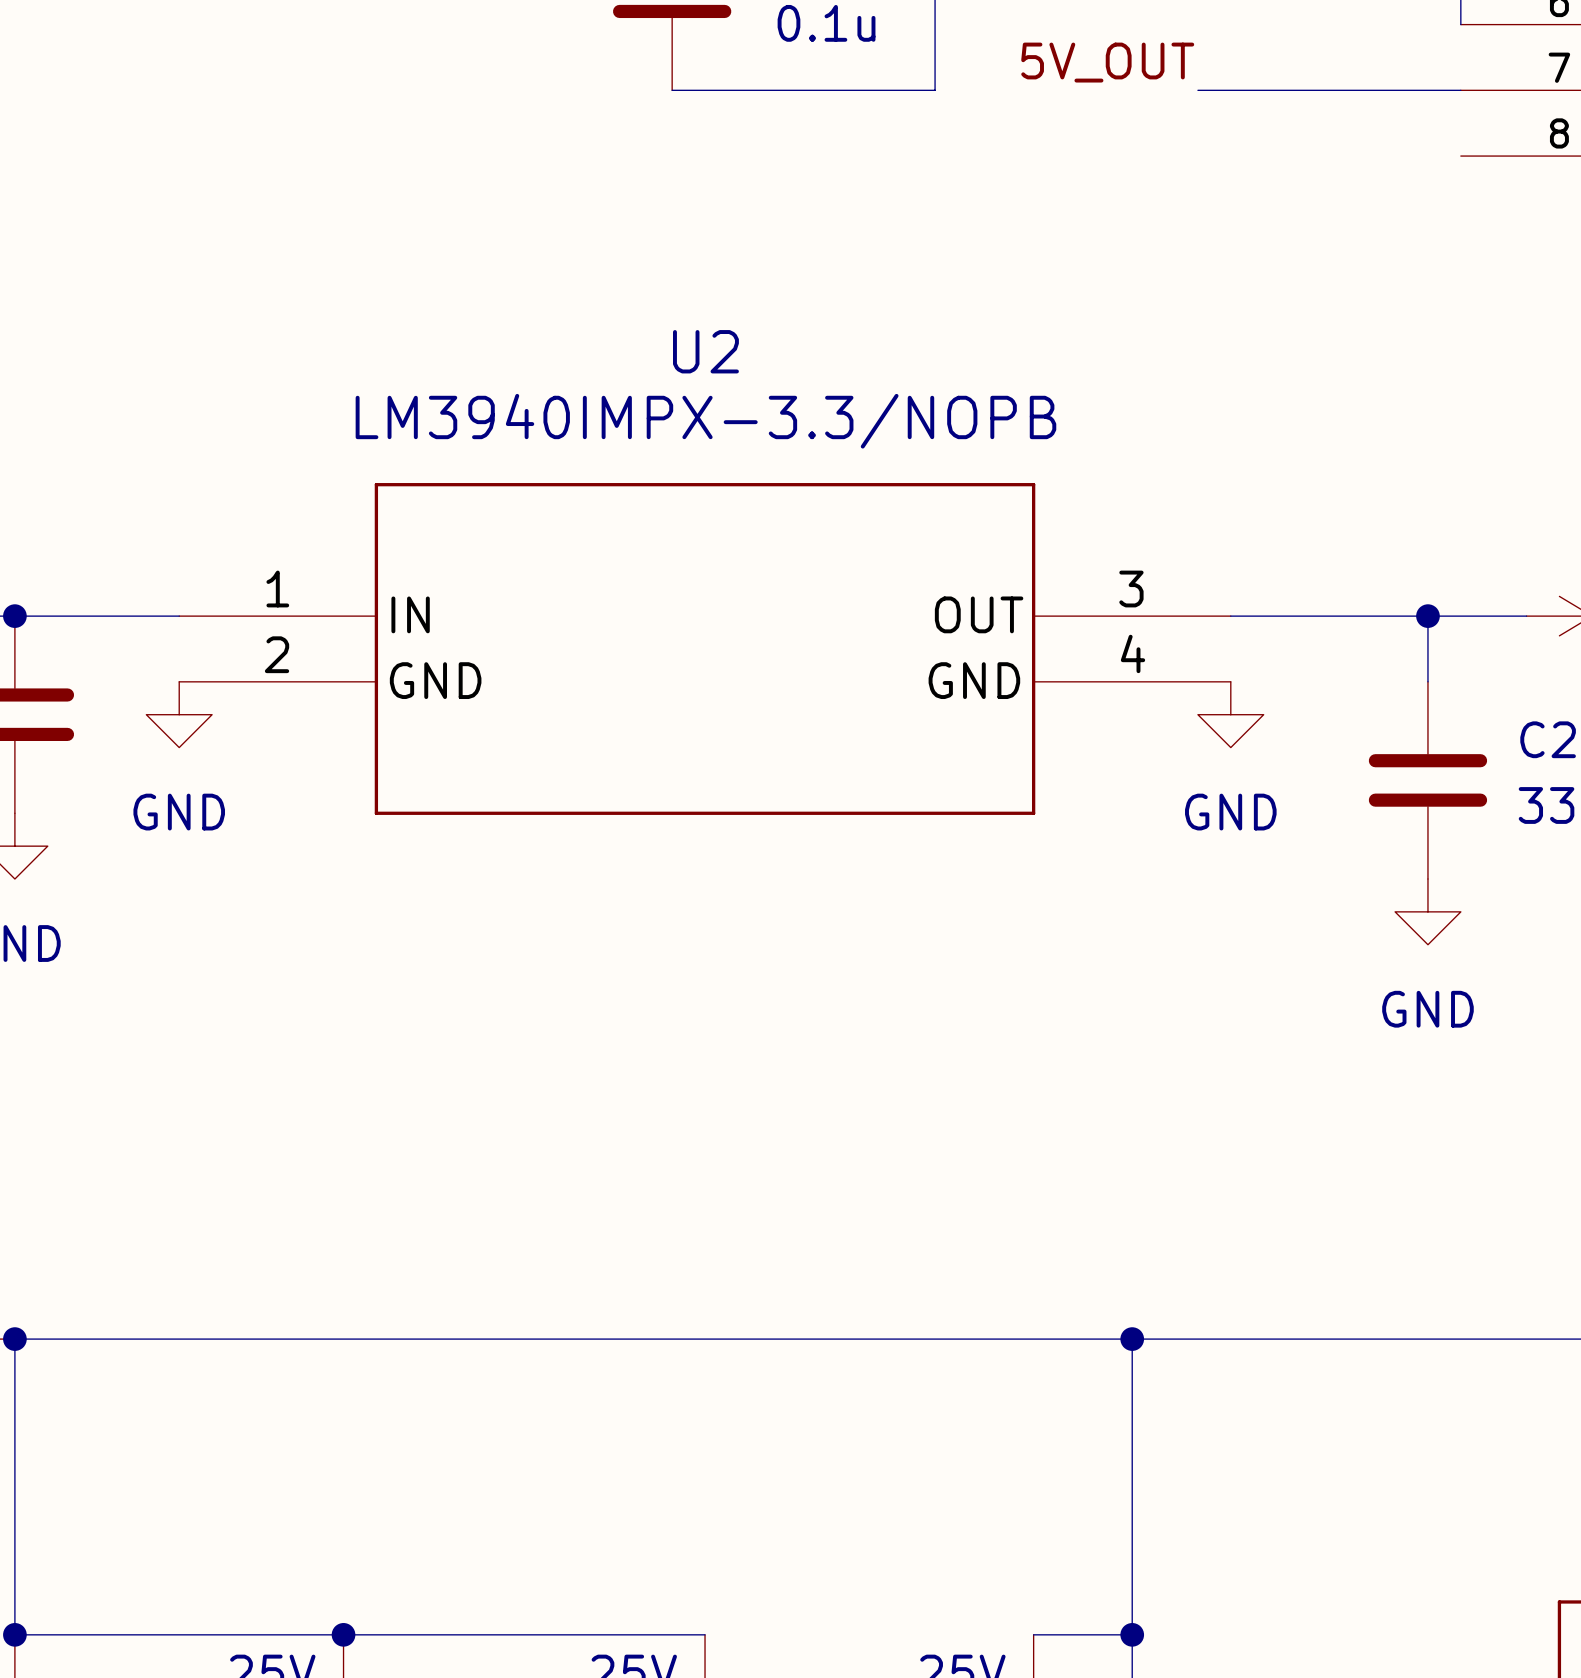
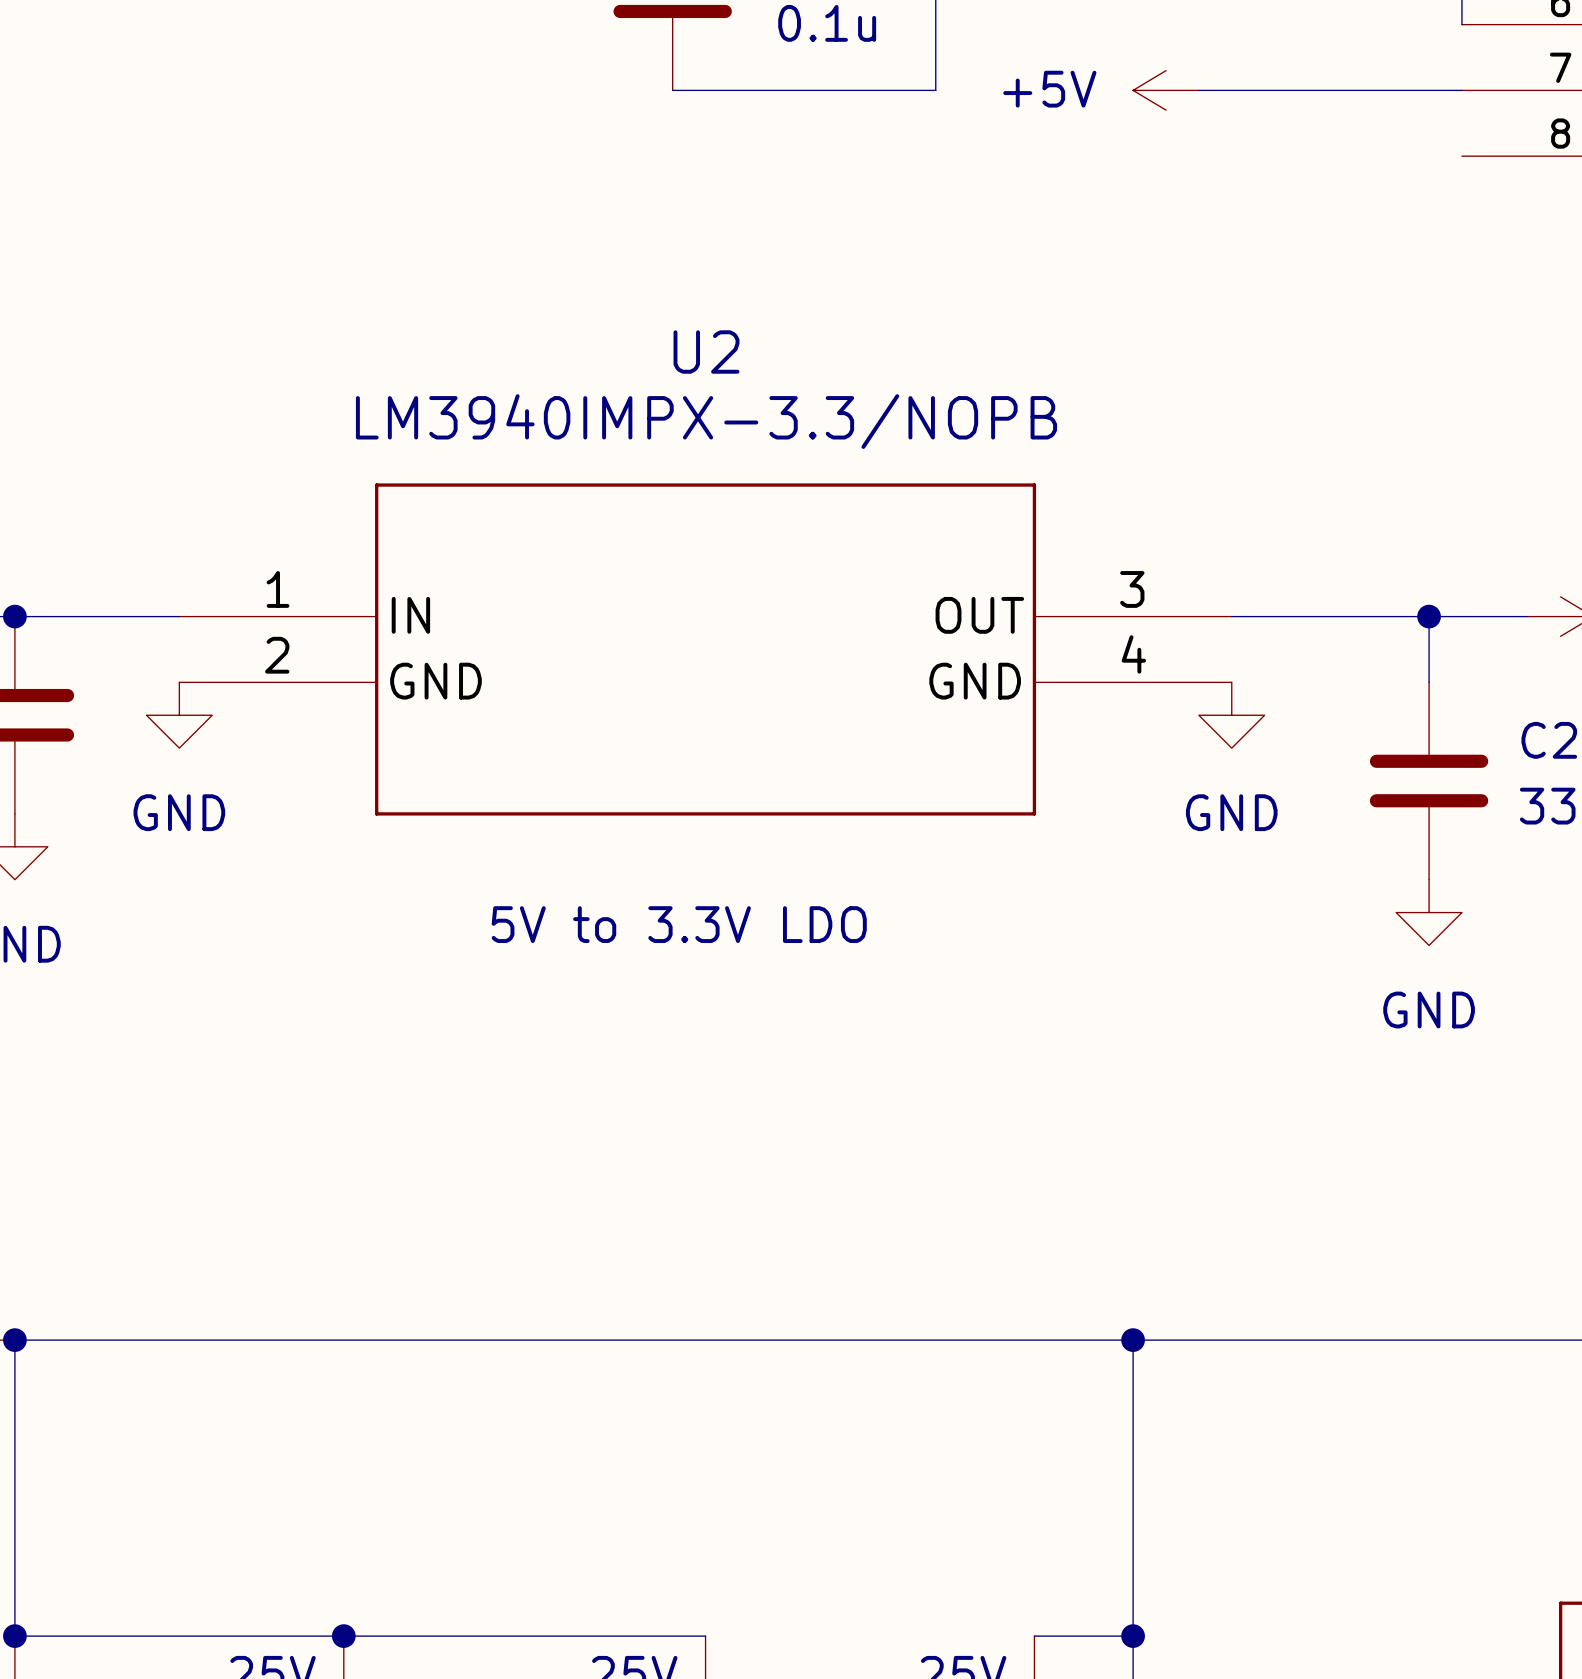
label: 5V_OUT (1107, 62) -> none
power symbol: none -> +5V (1165, 90)
text: none -> 5V to 3.3V LDO (679, 924)

